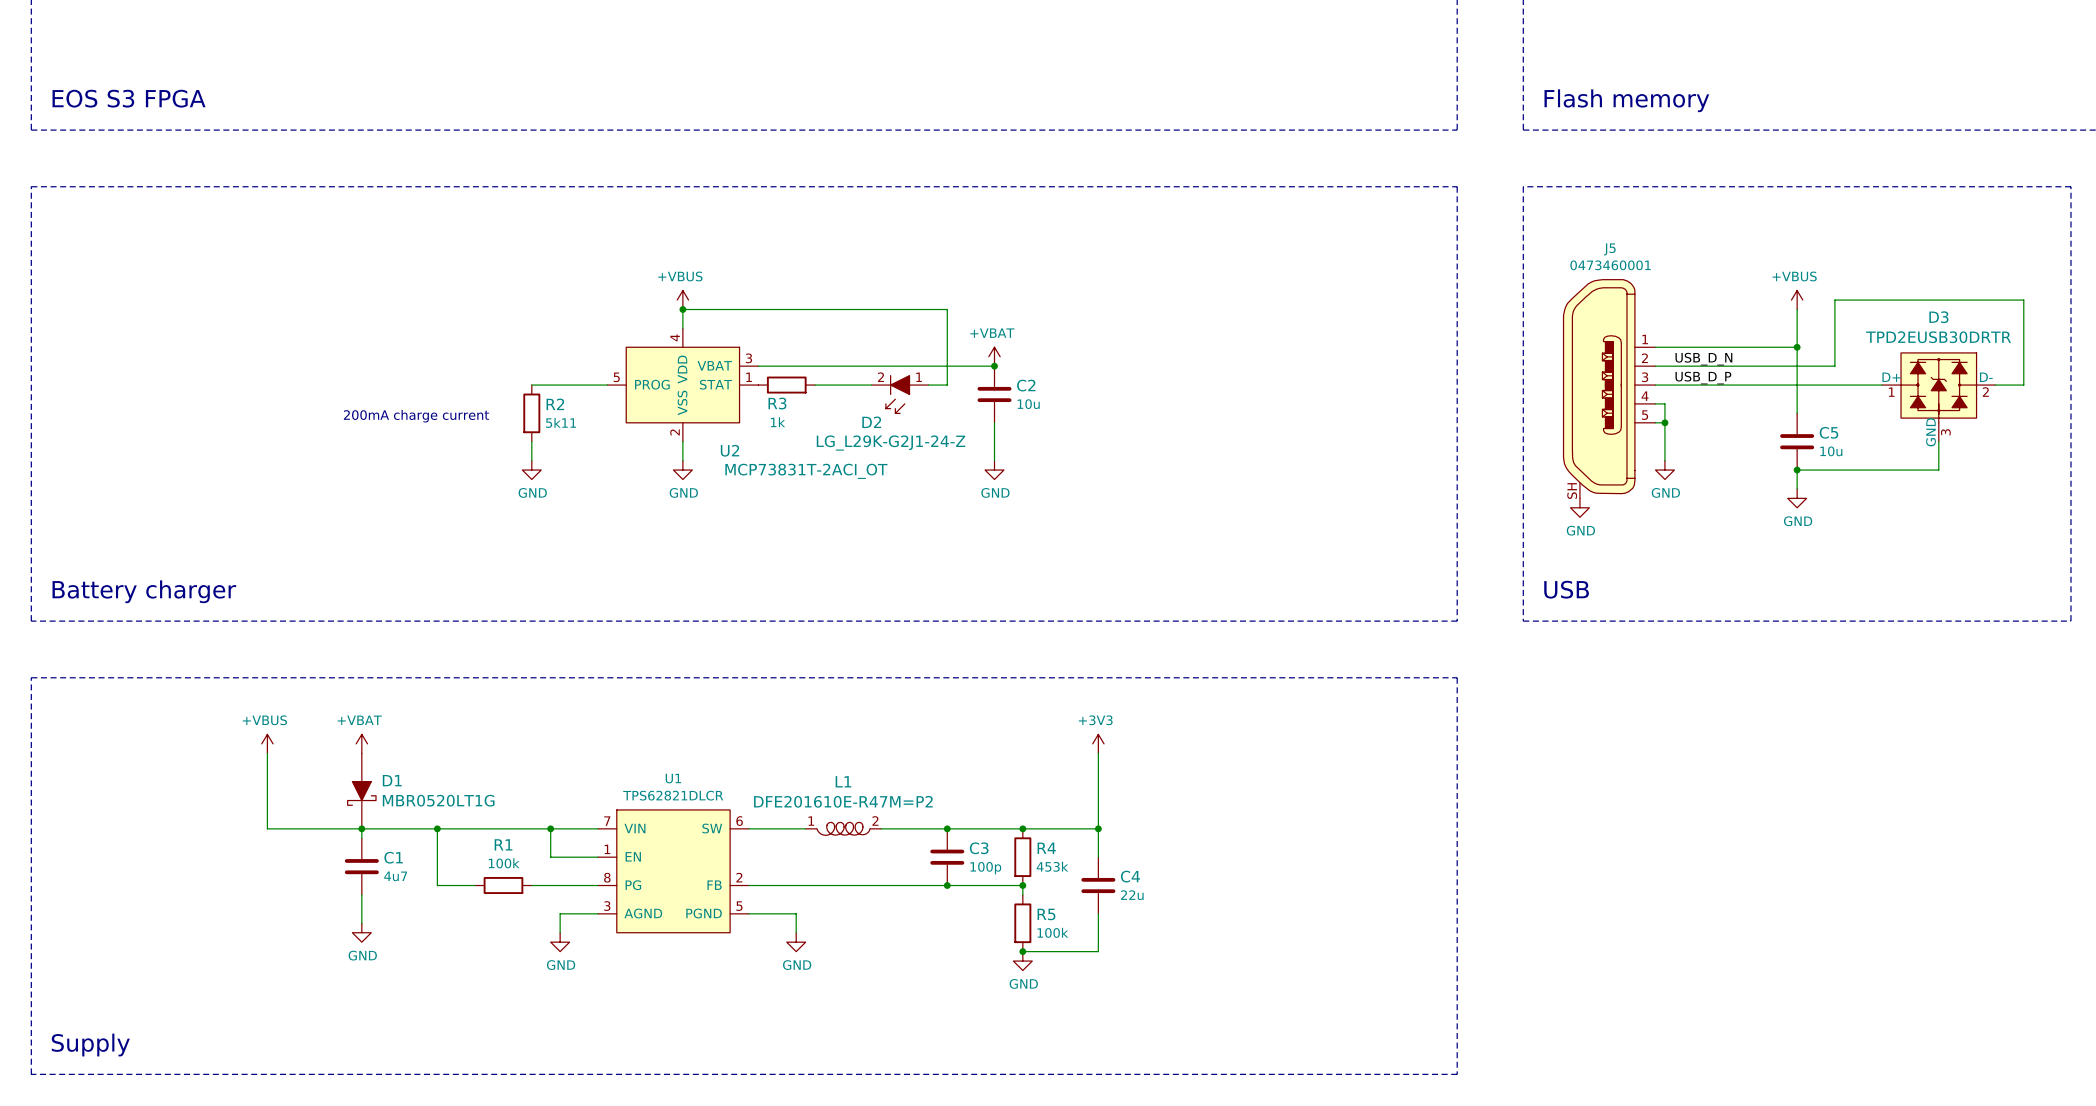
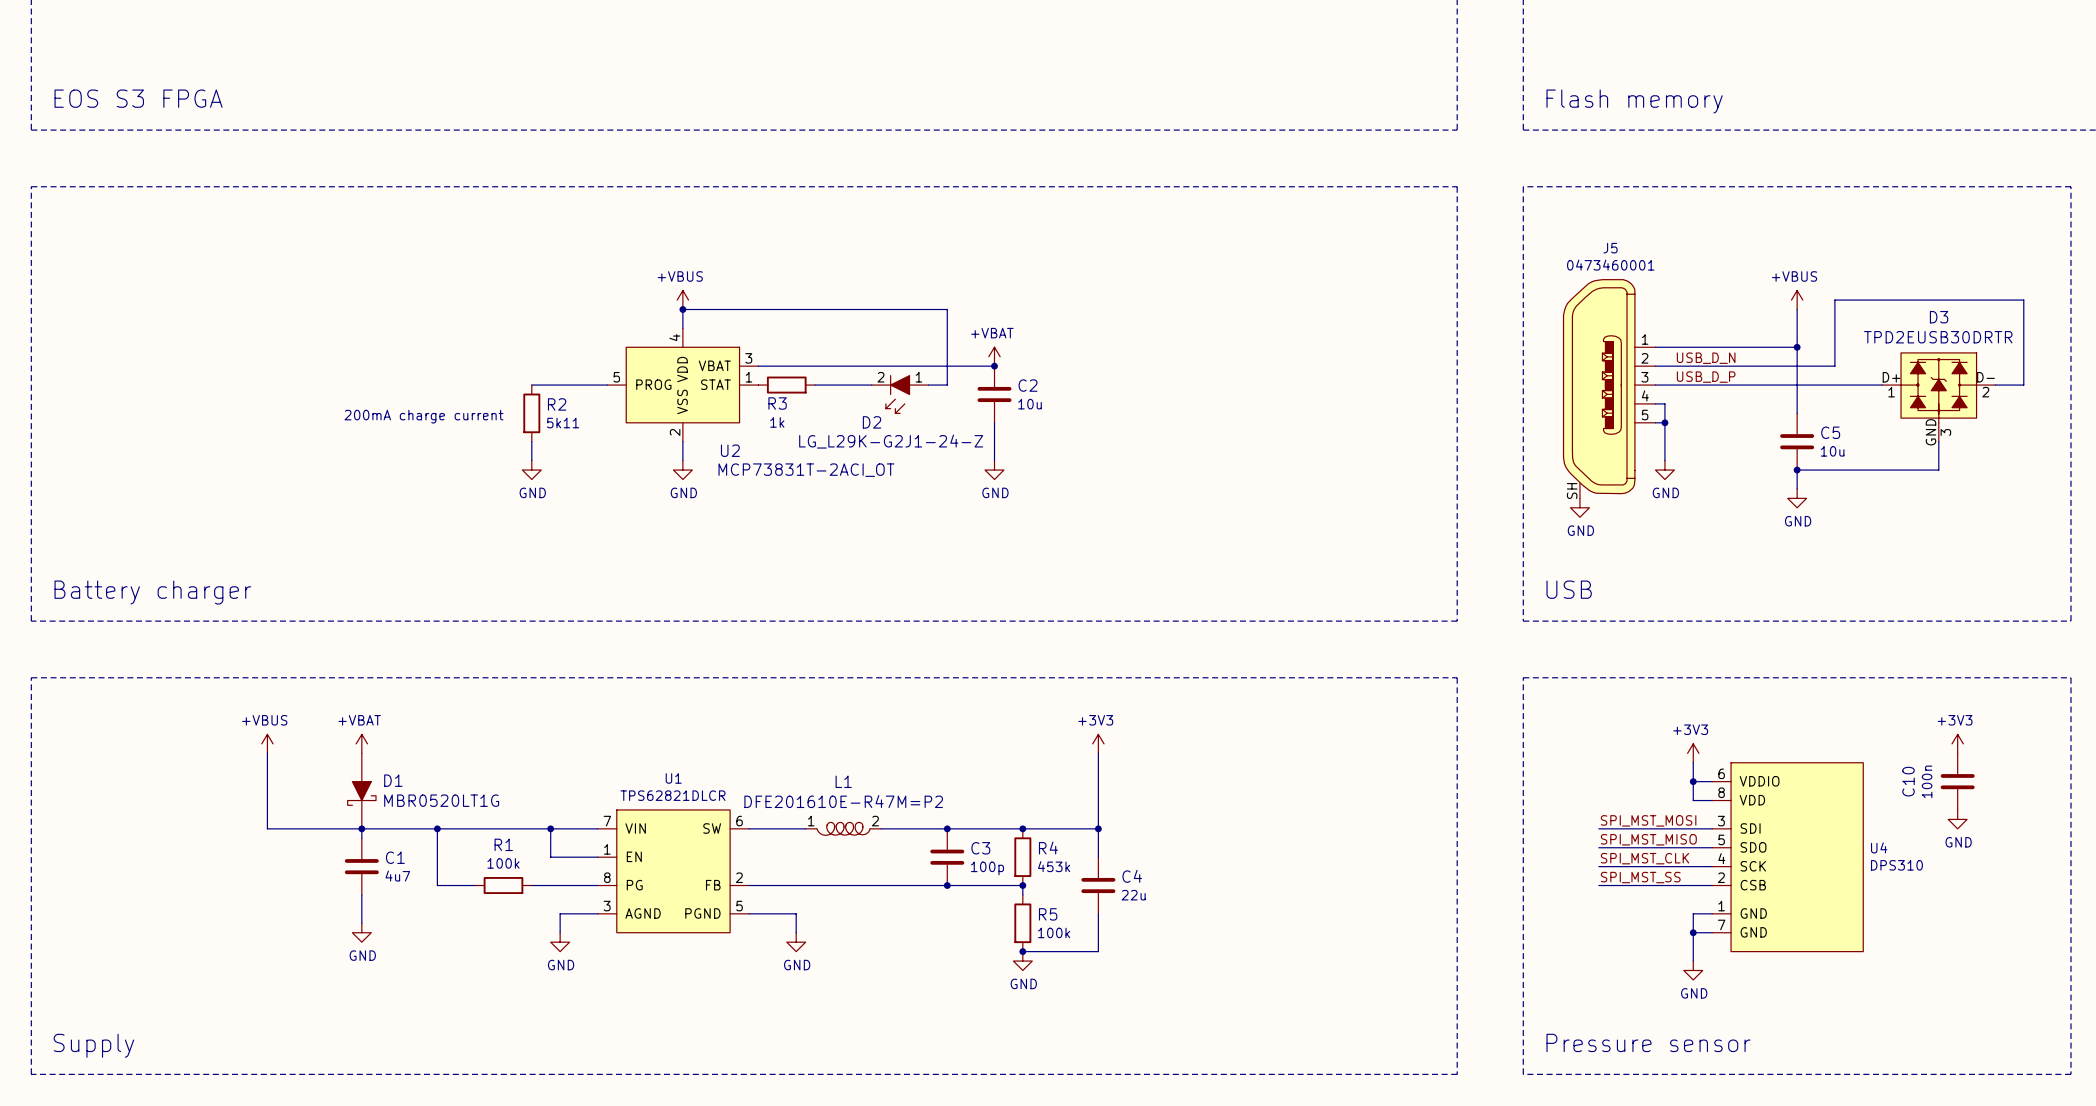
line: none -> (1523, 677) (2070, 677) (2070, 1074) (1523, 1074) (1523, 677)
power symbol: none -> +3V3 (1957, 743)
power symbol: none -> +3V3 (1693, 753)
wire: none -> (1693, 762) (1693, 800) (1712, 800)
wire: none -> (1693, 781) (1712, 781)
junction: none -> (1693, 781)
C10: none -> (1957, 781)
power symbol: none -> GND (1957, 819)
label: none -> SPI_MST_MOSI (1648, 820)
wire: none -> (1598, 828) (1712, 828)
label: none -> SPI_MST_MISO (1648, 839)
wire: none -> (1598, 847) (1712, 847)
U4: none -> DPS310 (1787, 857)
label: none -> SPI_MST_CLK (1645, 858)
wire: none -> (1598, 866) (1712, 866)
label: none -> SPI_MST_SS (1640, 877)
wire: none -> (1598, 885) (1712, 885)
wire: none -> (1712, 913) (1693, 913) (1693, 961)
wire: none -> (1693, 932) (1712, 932)
junction: none -> (1693, 932)
power symbol: none -> GND (1693, 970)
text: none -> Pressure sensor (1648, 1042)

